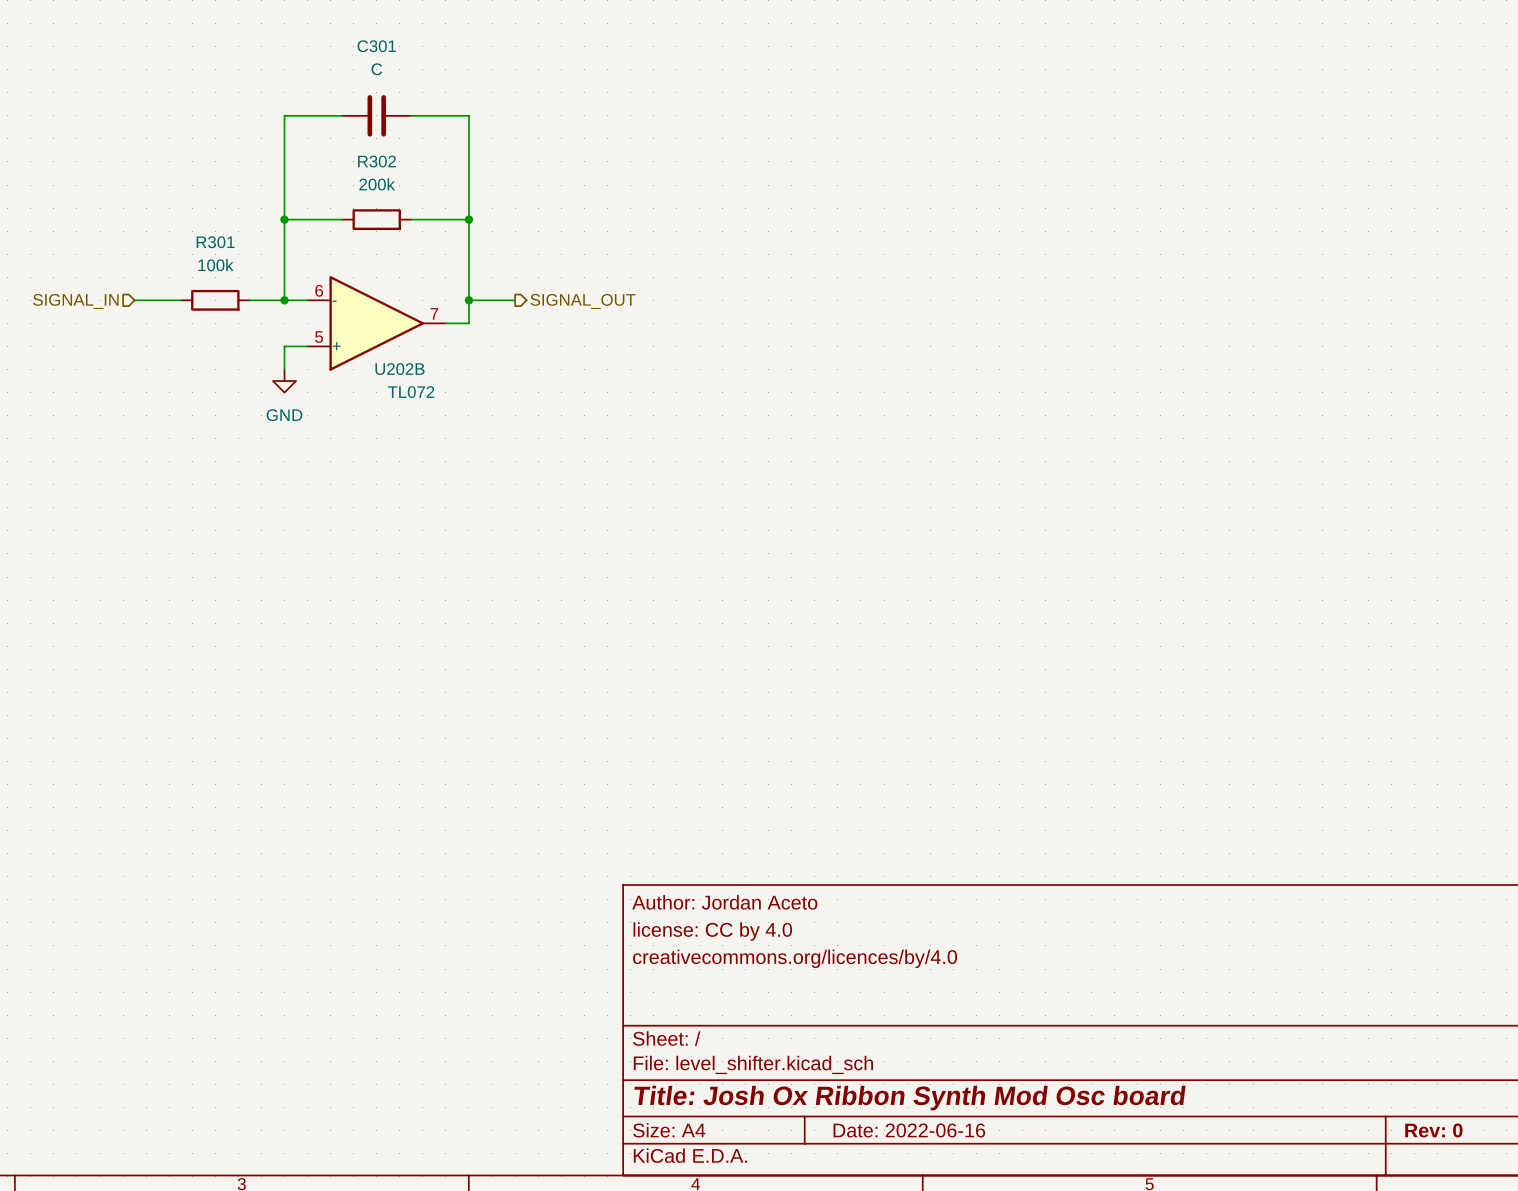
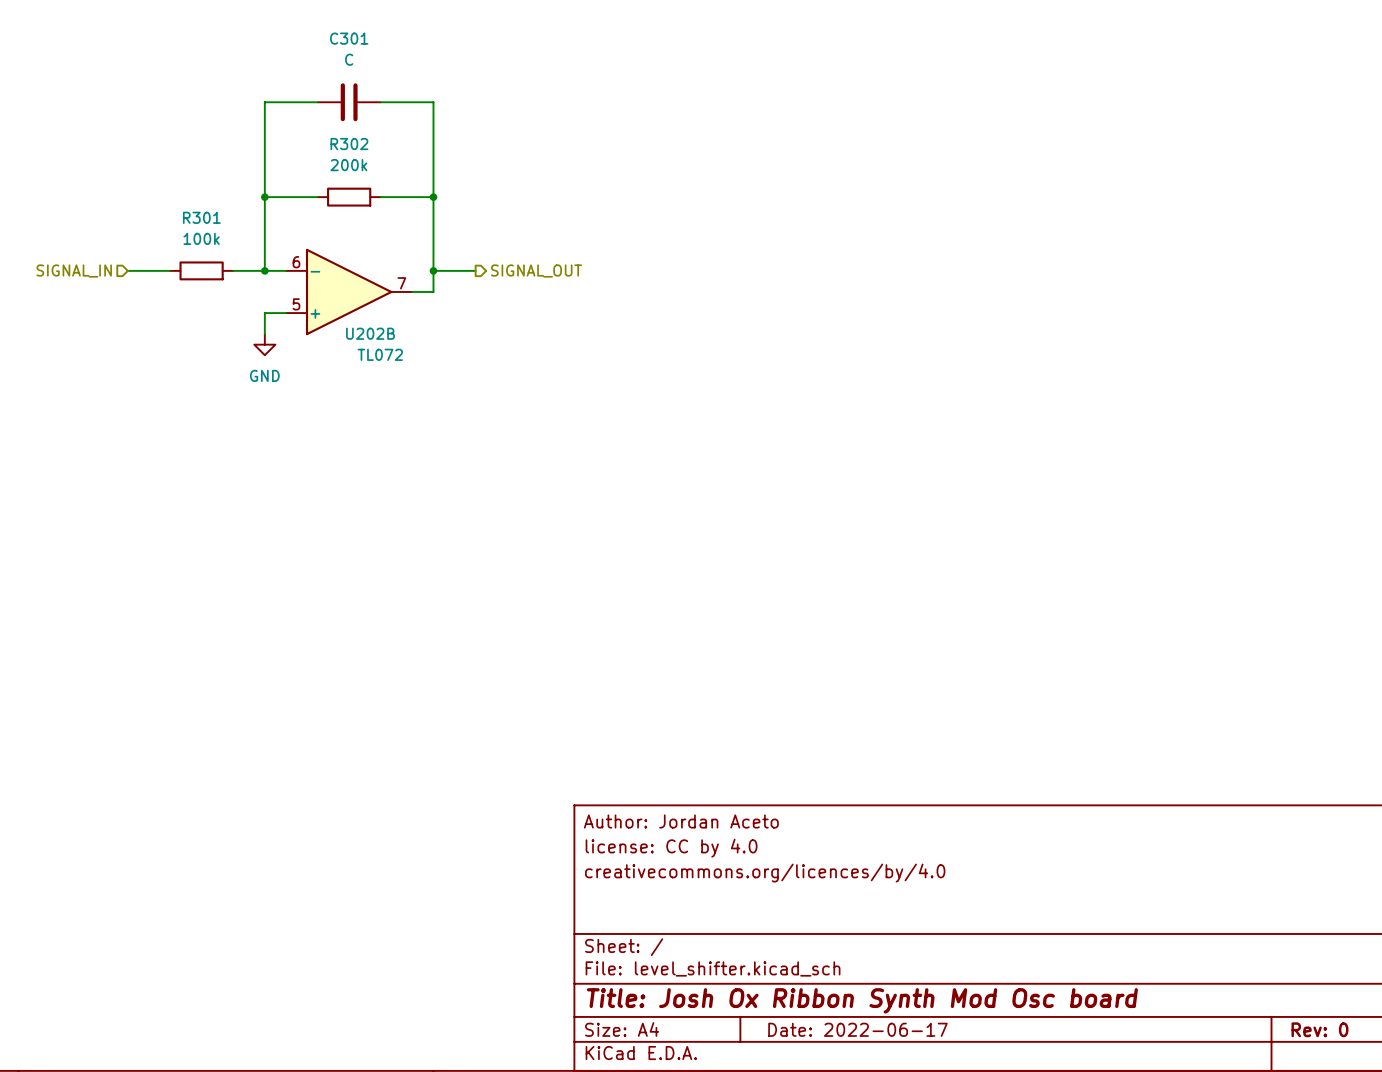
title block: Date: 2022-06-16 (909, 1130) -> Date: 2022-06-17 (857, 1029)

